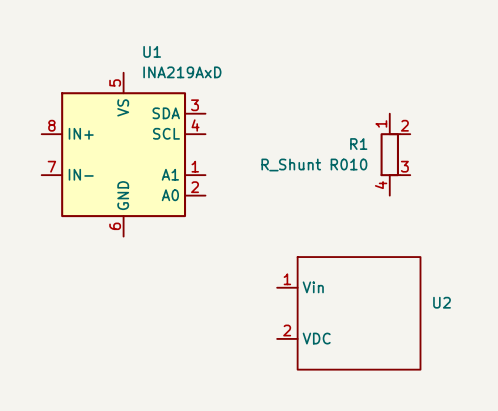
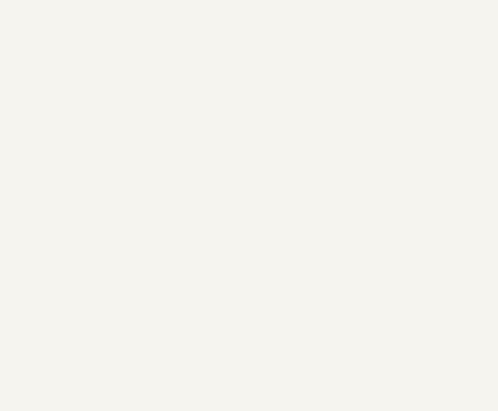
U1: INA219AxD (123, 154) -> none
R1: R_Shunt R010 (395, 154) -> none
U2: (348, 313) -> none

